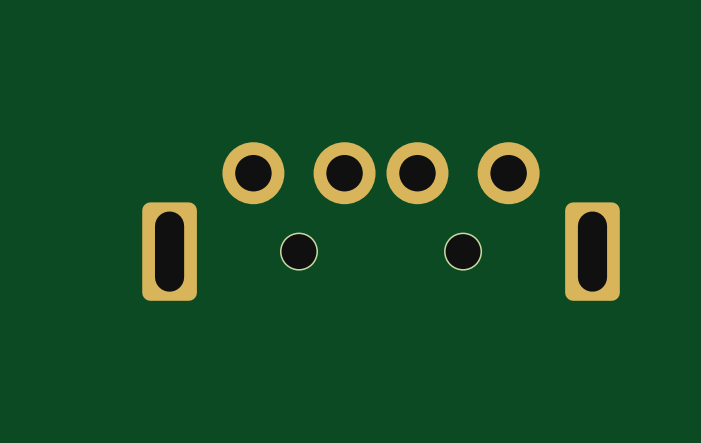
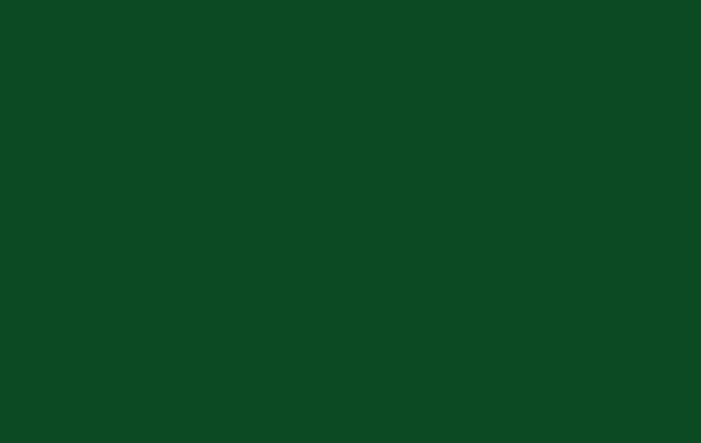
part: (381, 221) -> none

